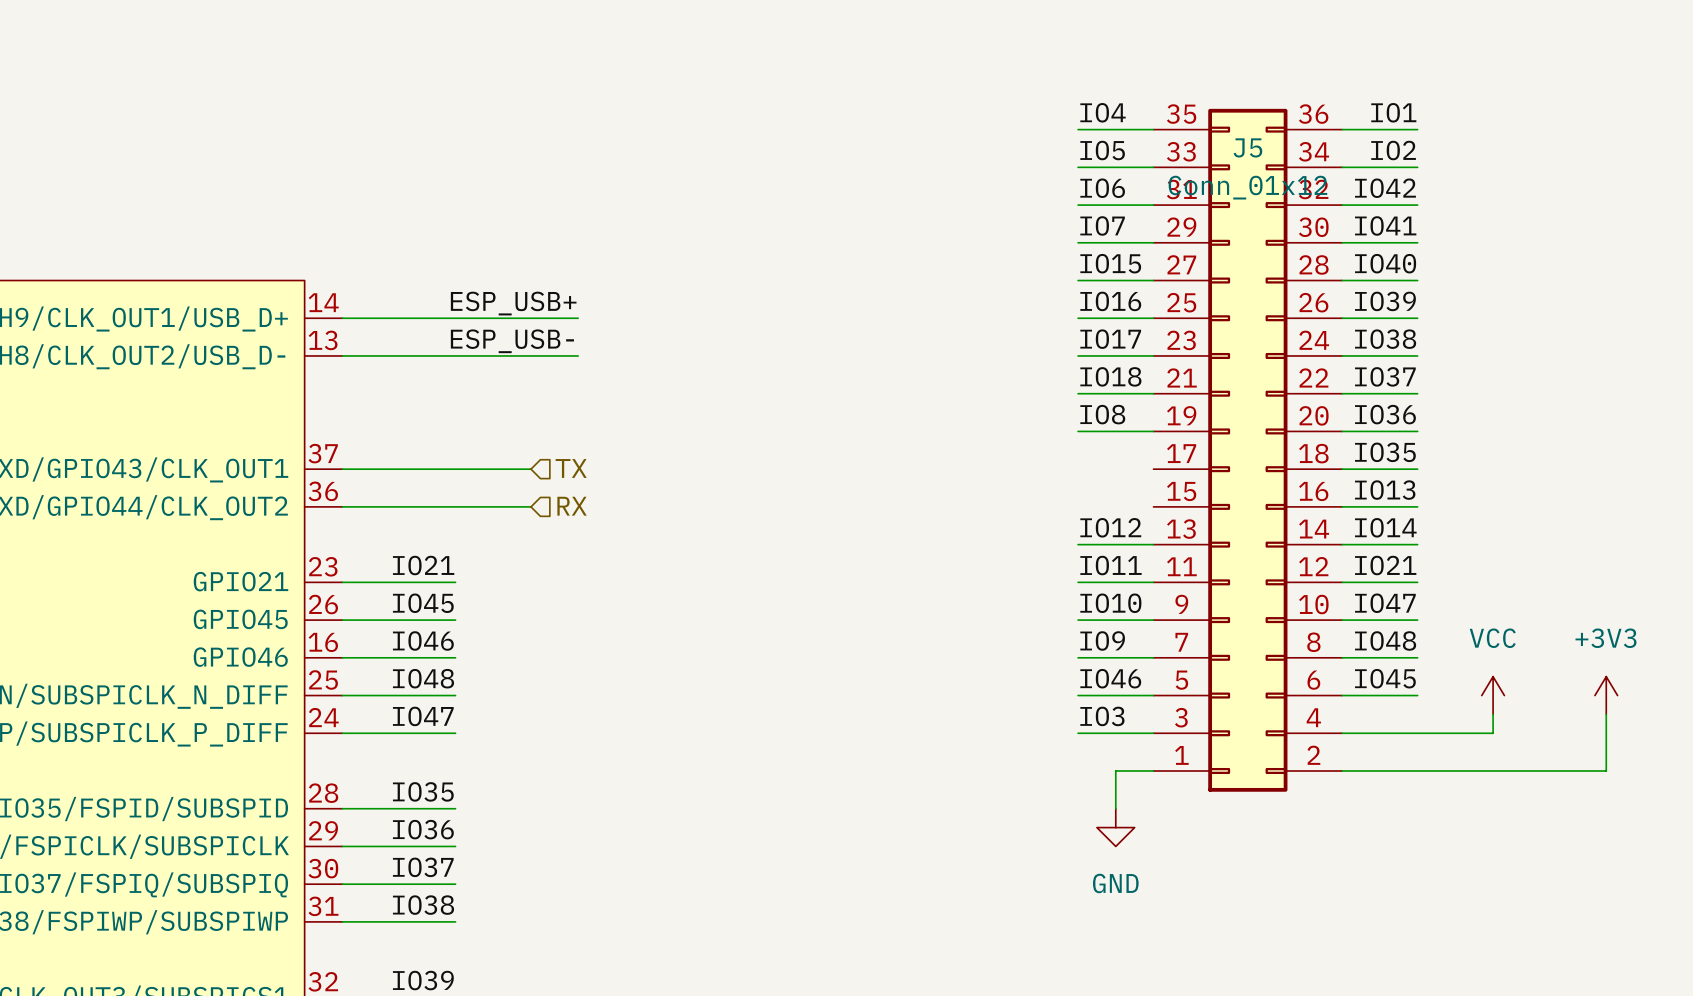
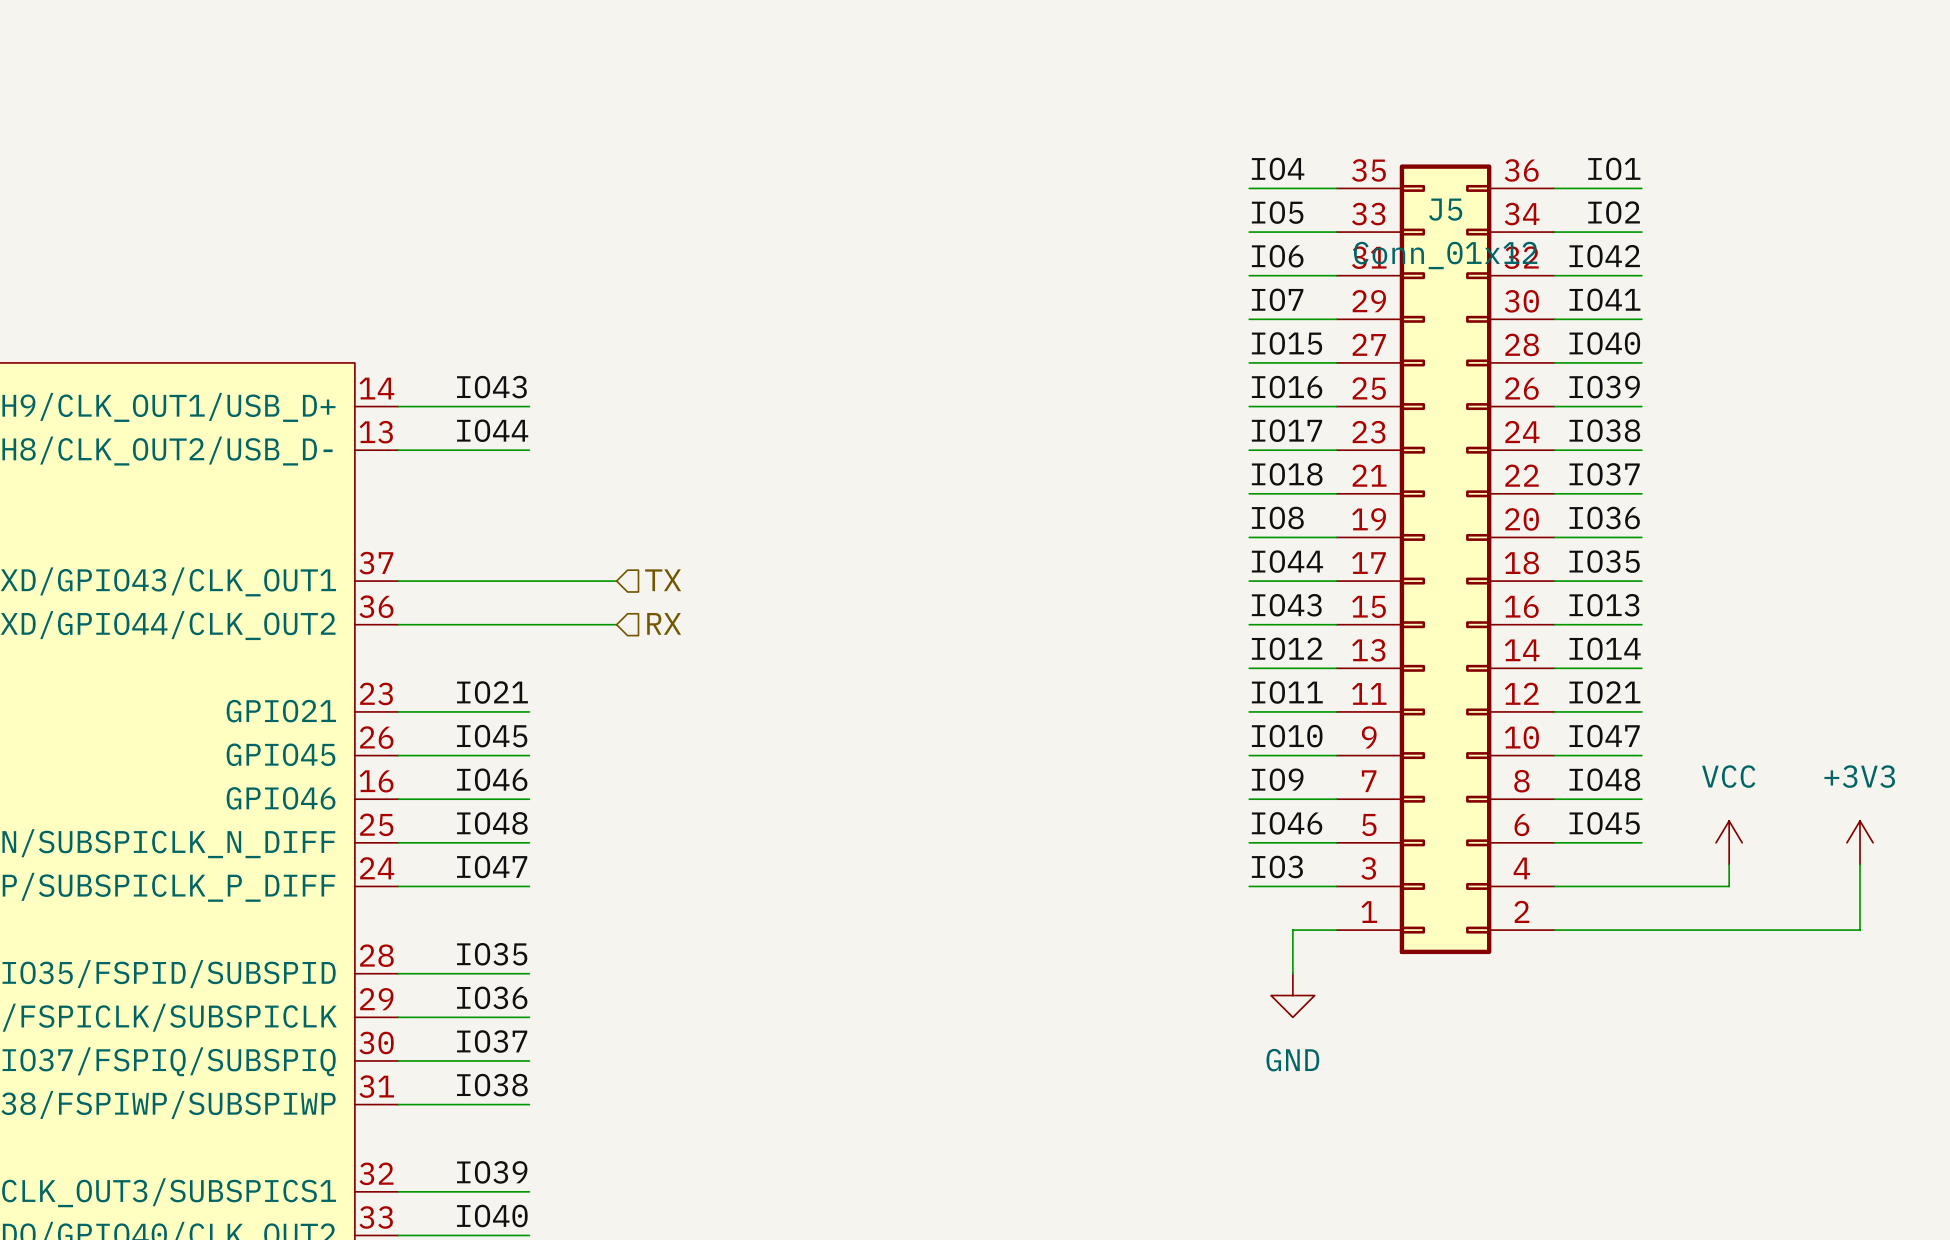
label: none -> IO43 (491, 387)
label: ESP_USB+ (513, 303) -> none
wire: (455, 318) (578, 318) -> none
label: none -> IO44 (492, 430)
label: ESP_USB- (512, 341) -> none
wire: (455, 355) (578, 355) -> none
label: none -> IO44 (1287, 561)
wire: none -> (1249, 581) (1336, 581)
label: none -> IO43 (1286, 605)
wire: none -> (1249, 624) (1336, 624)

